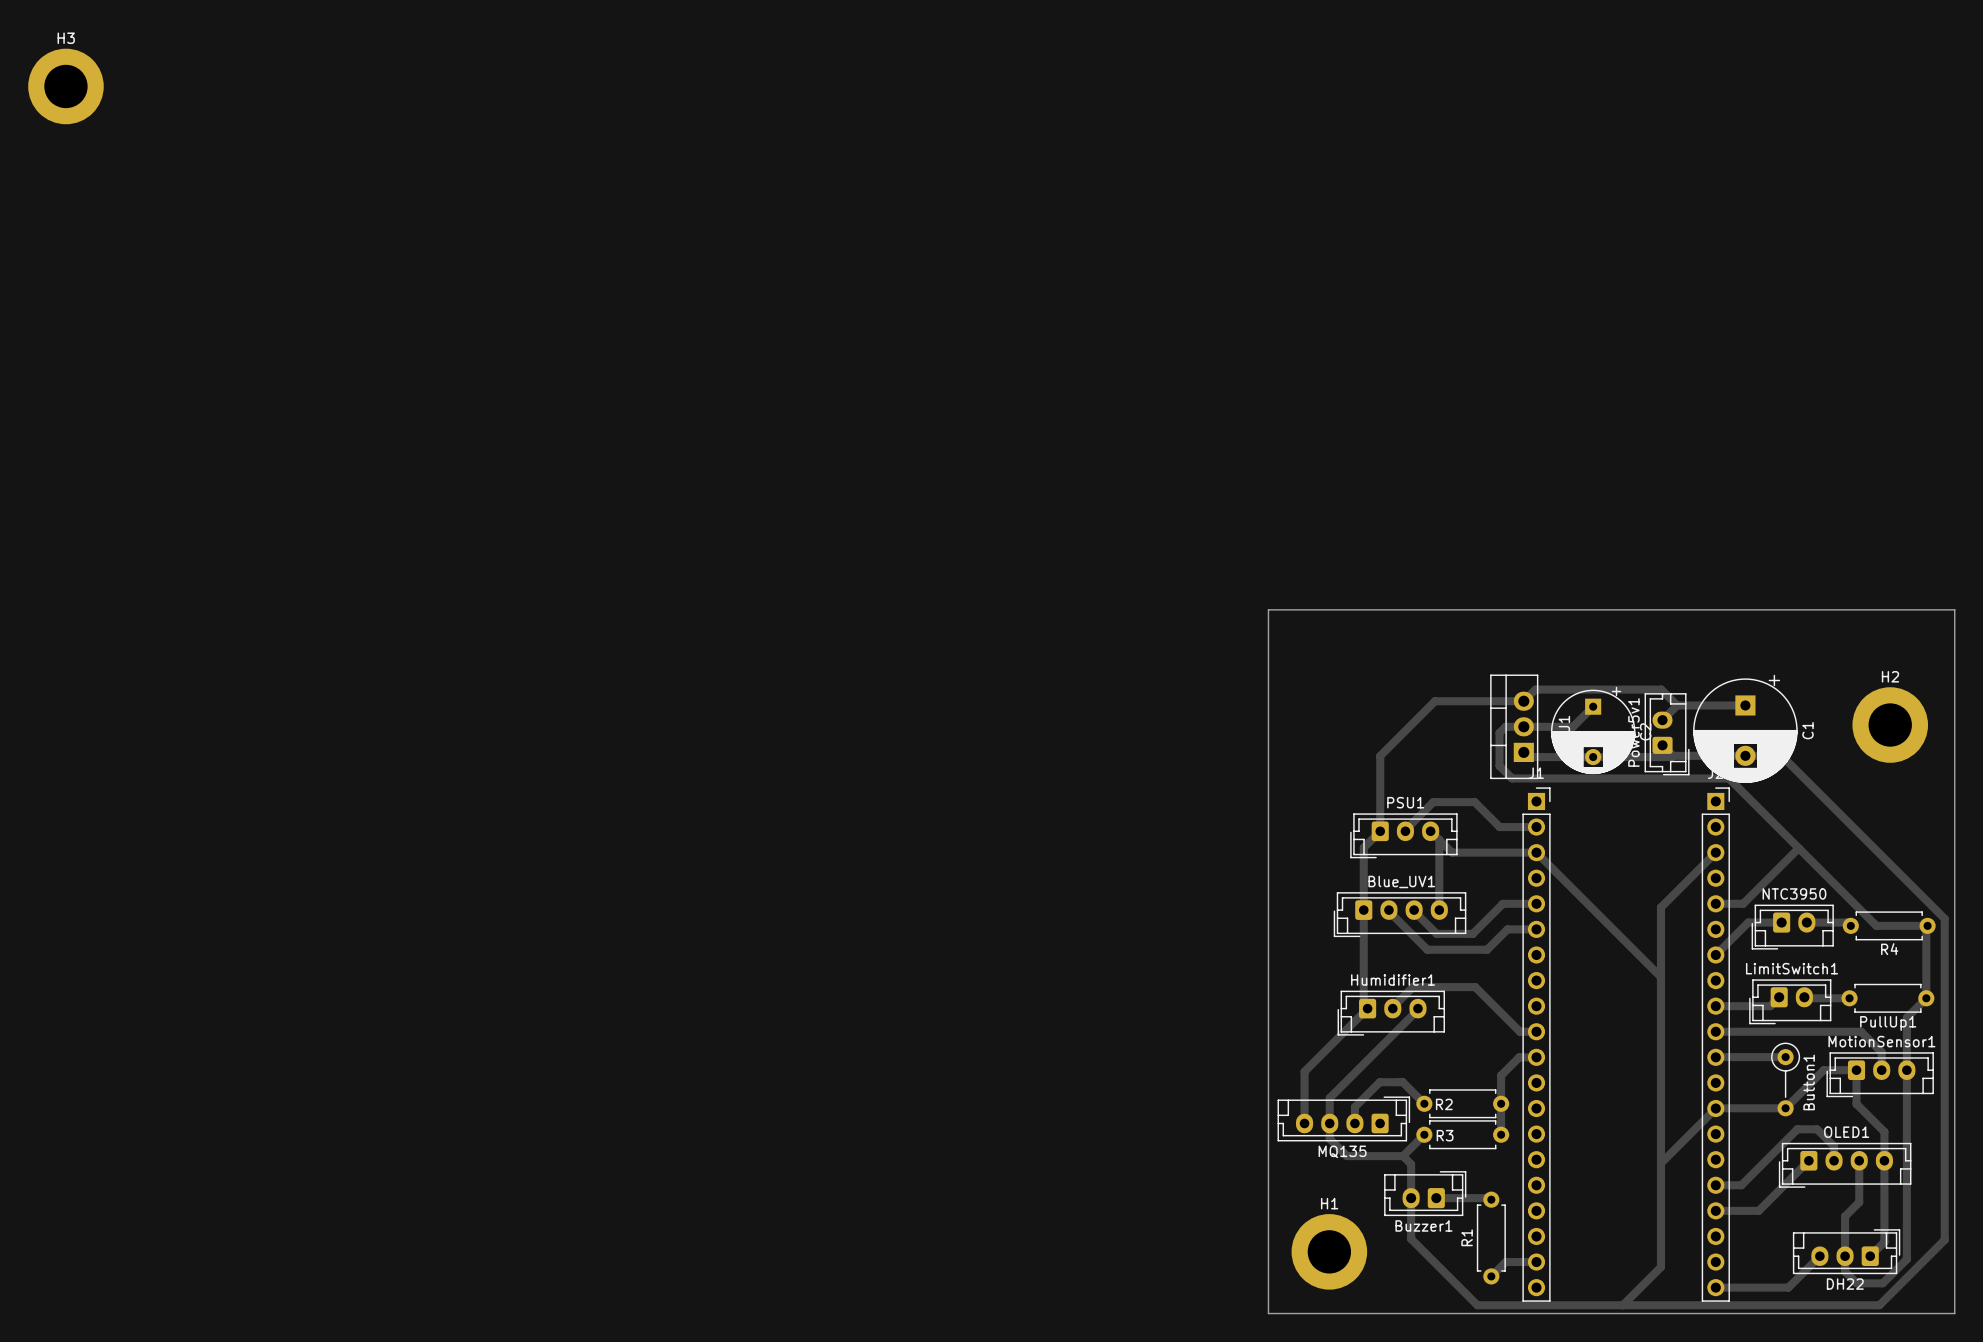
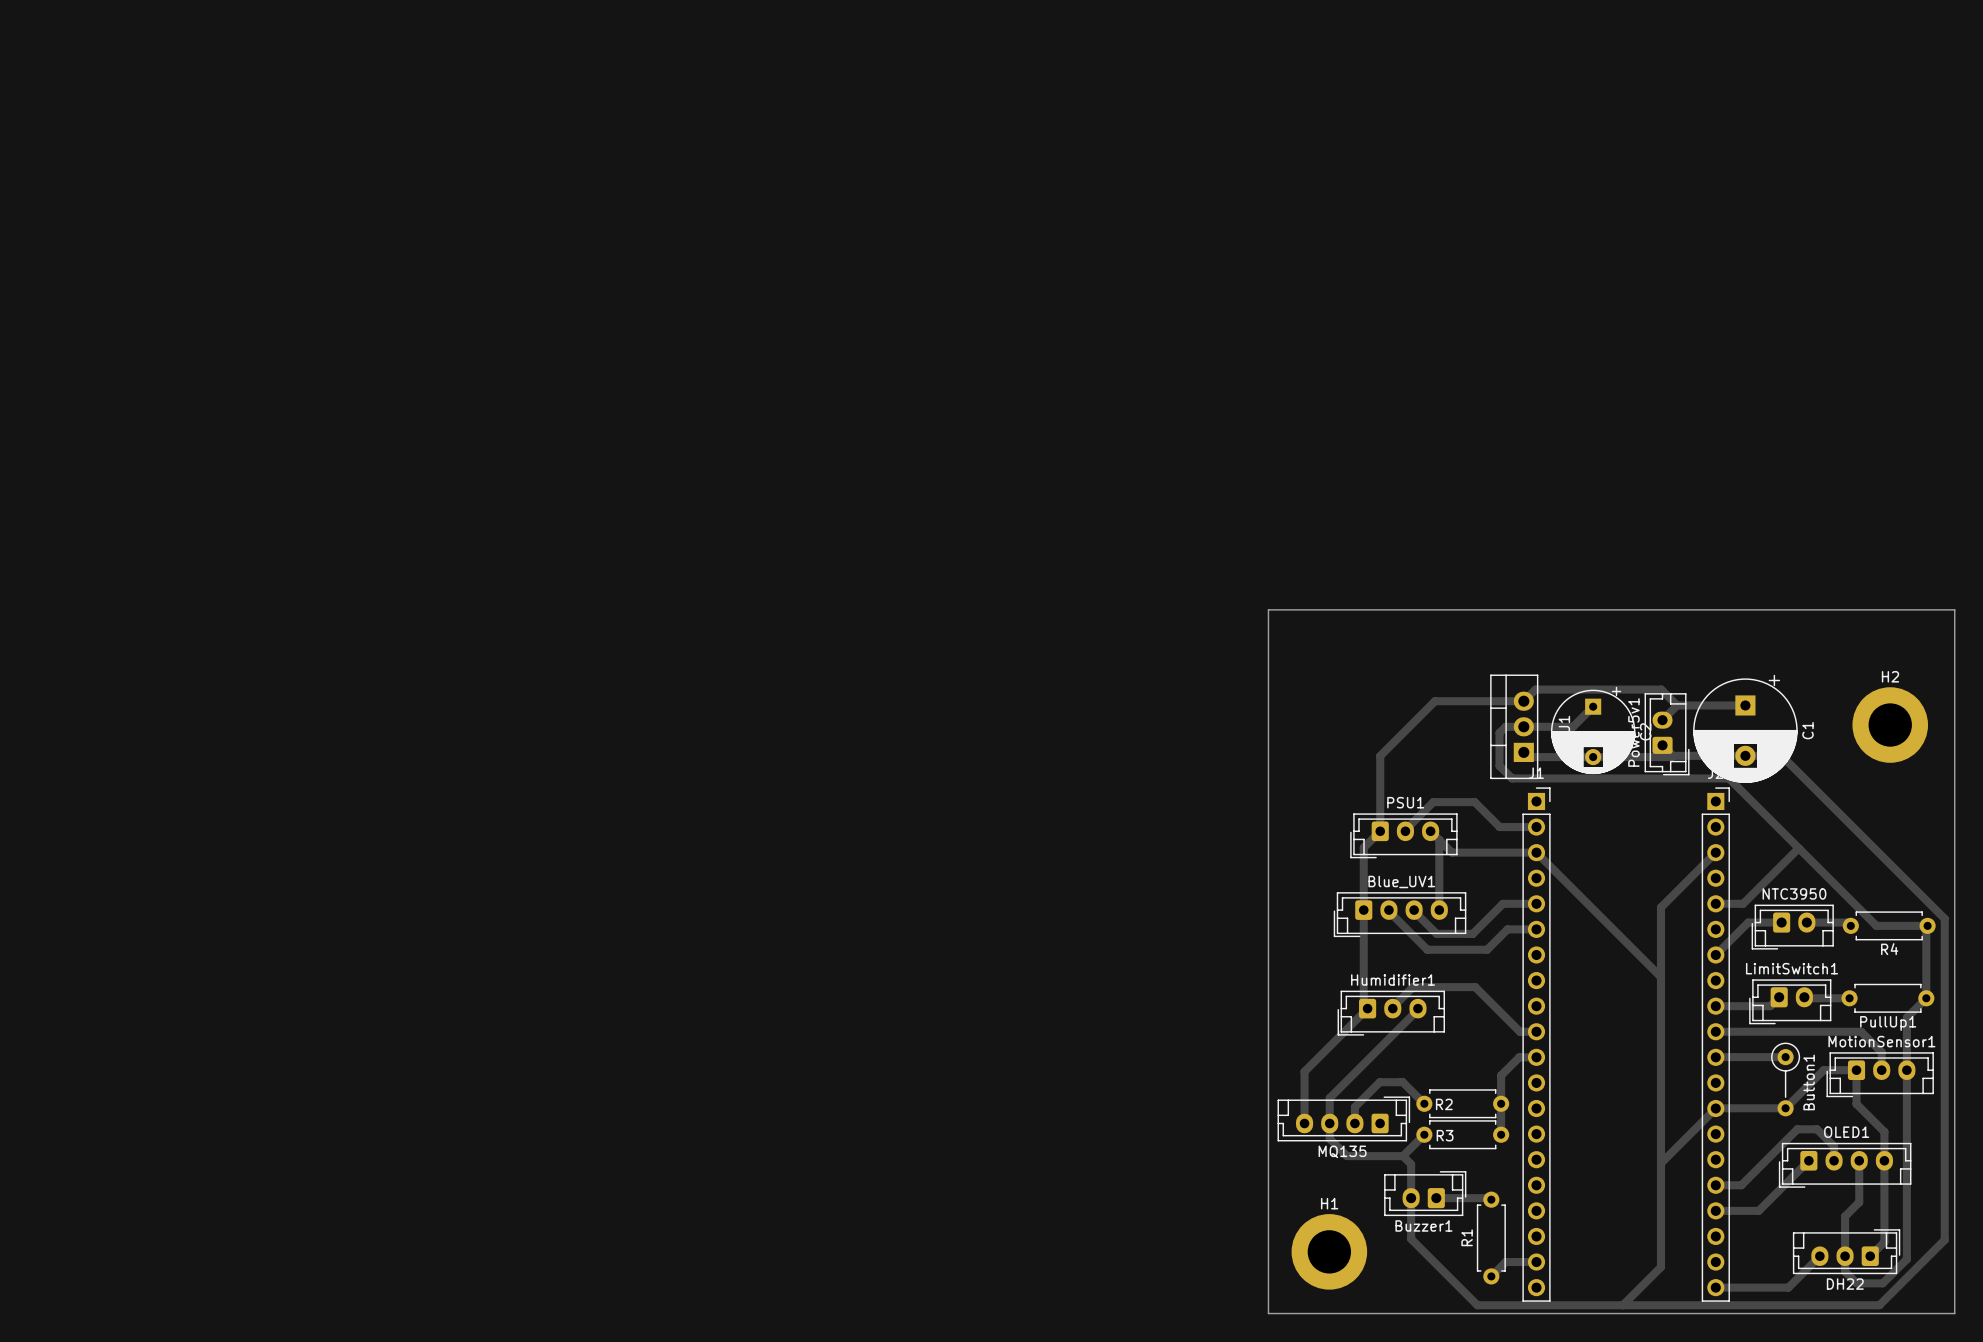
H3: (65, 86) -> none

